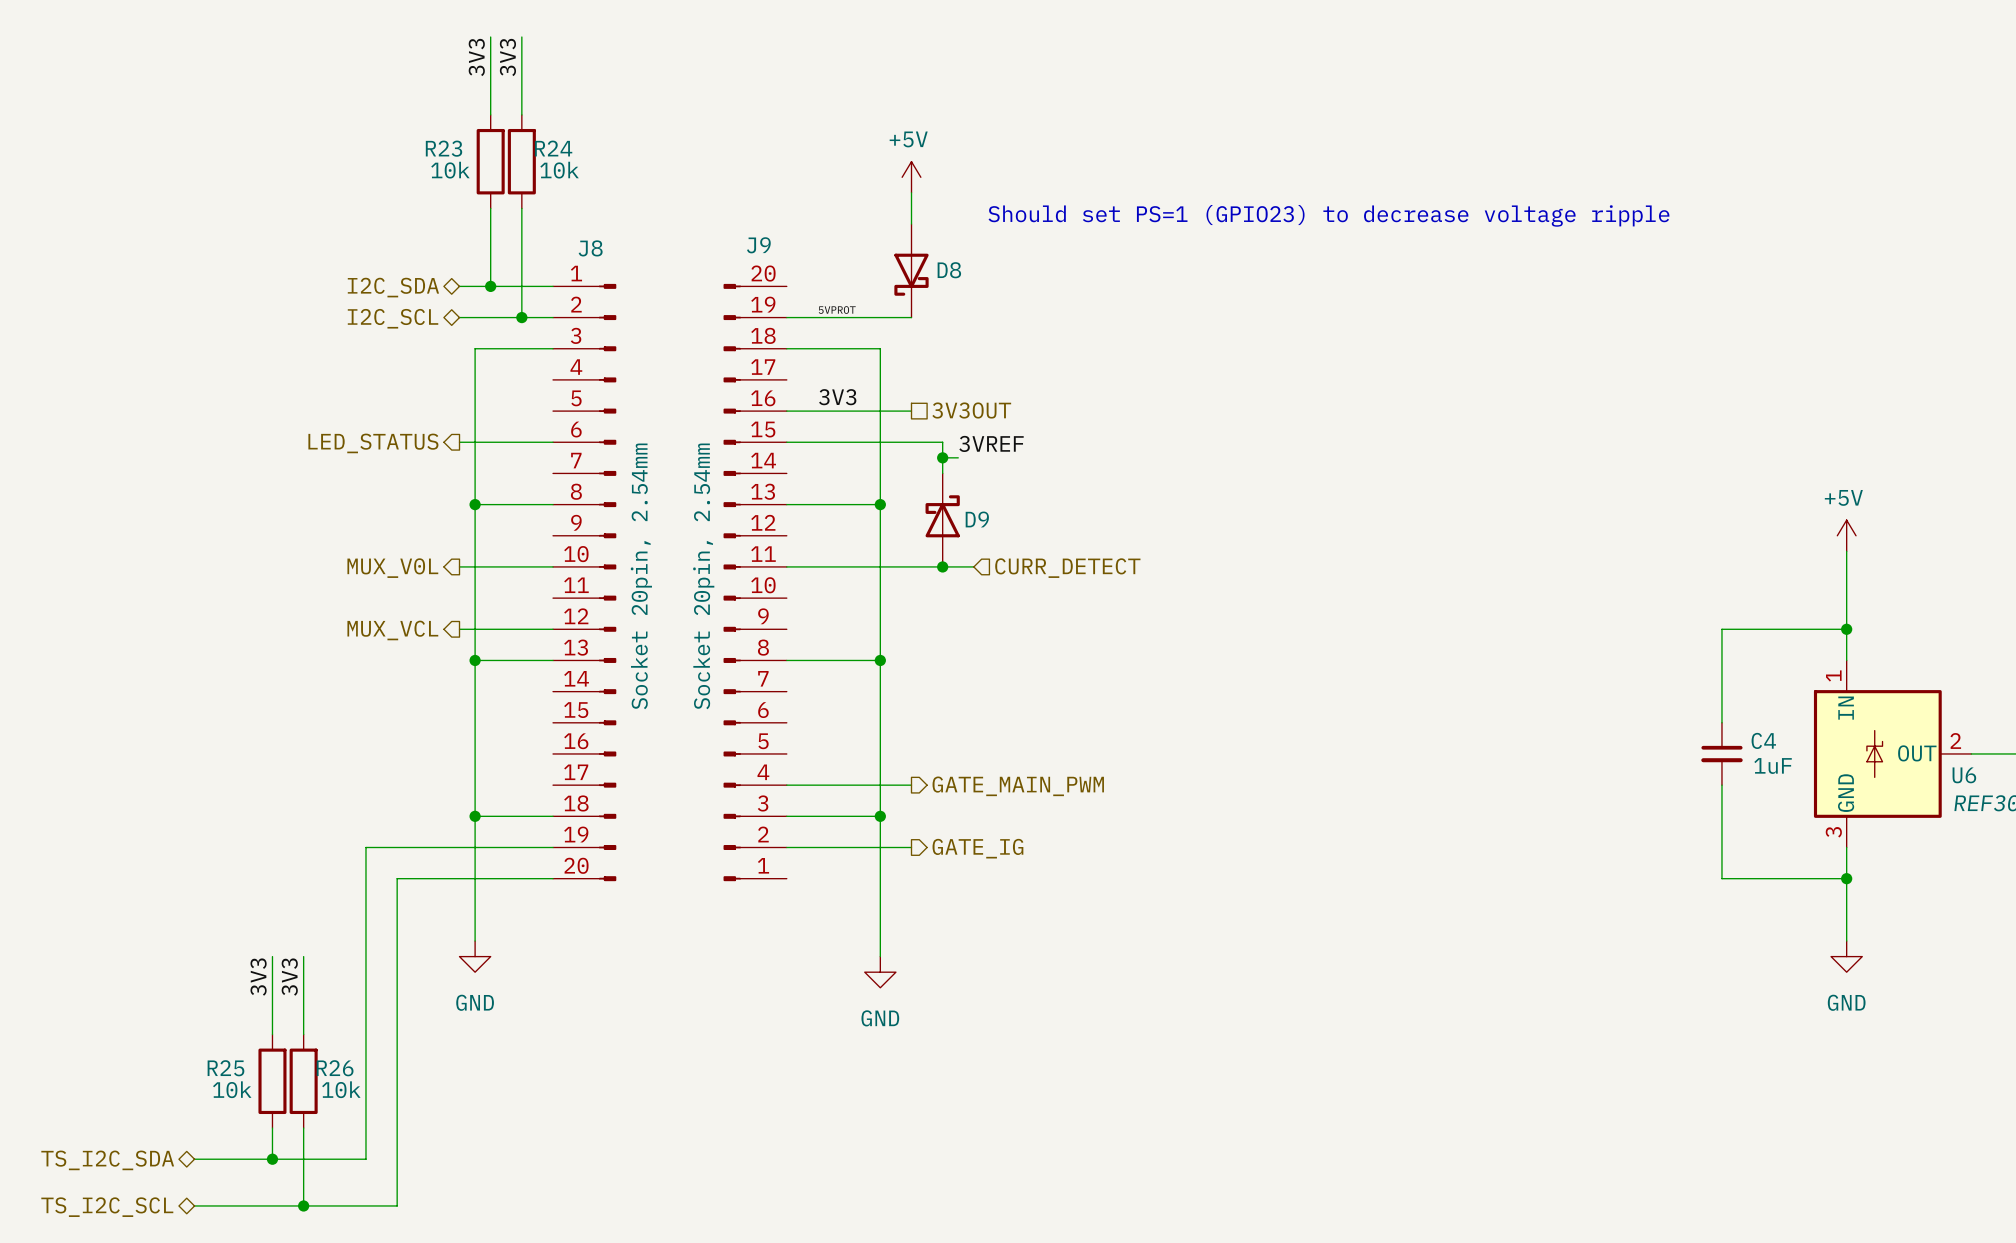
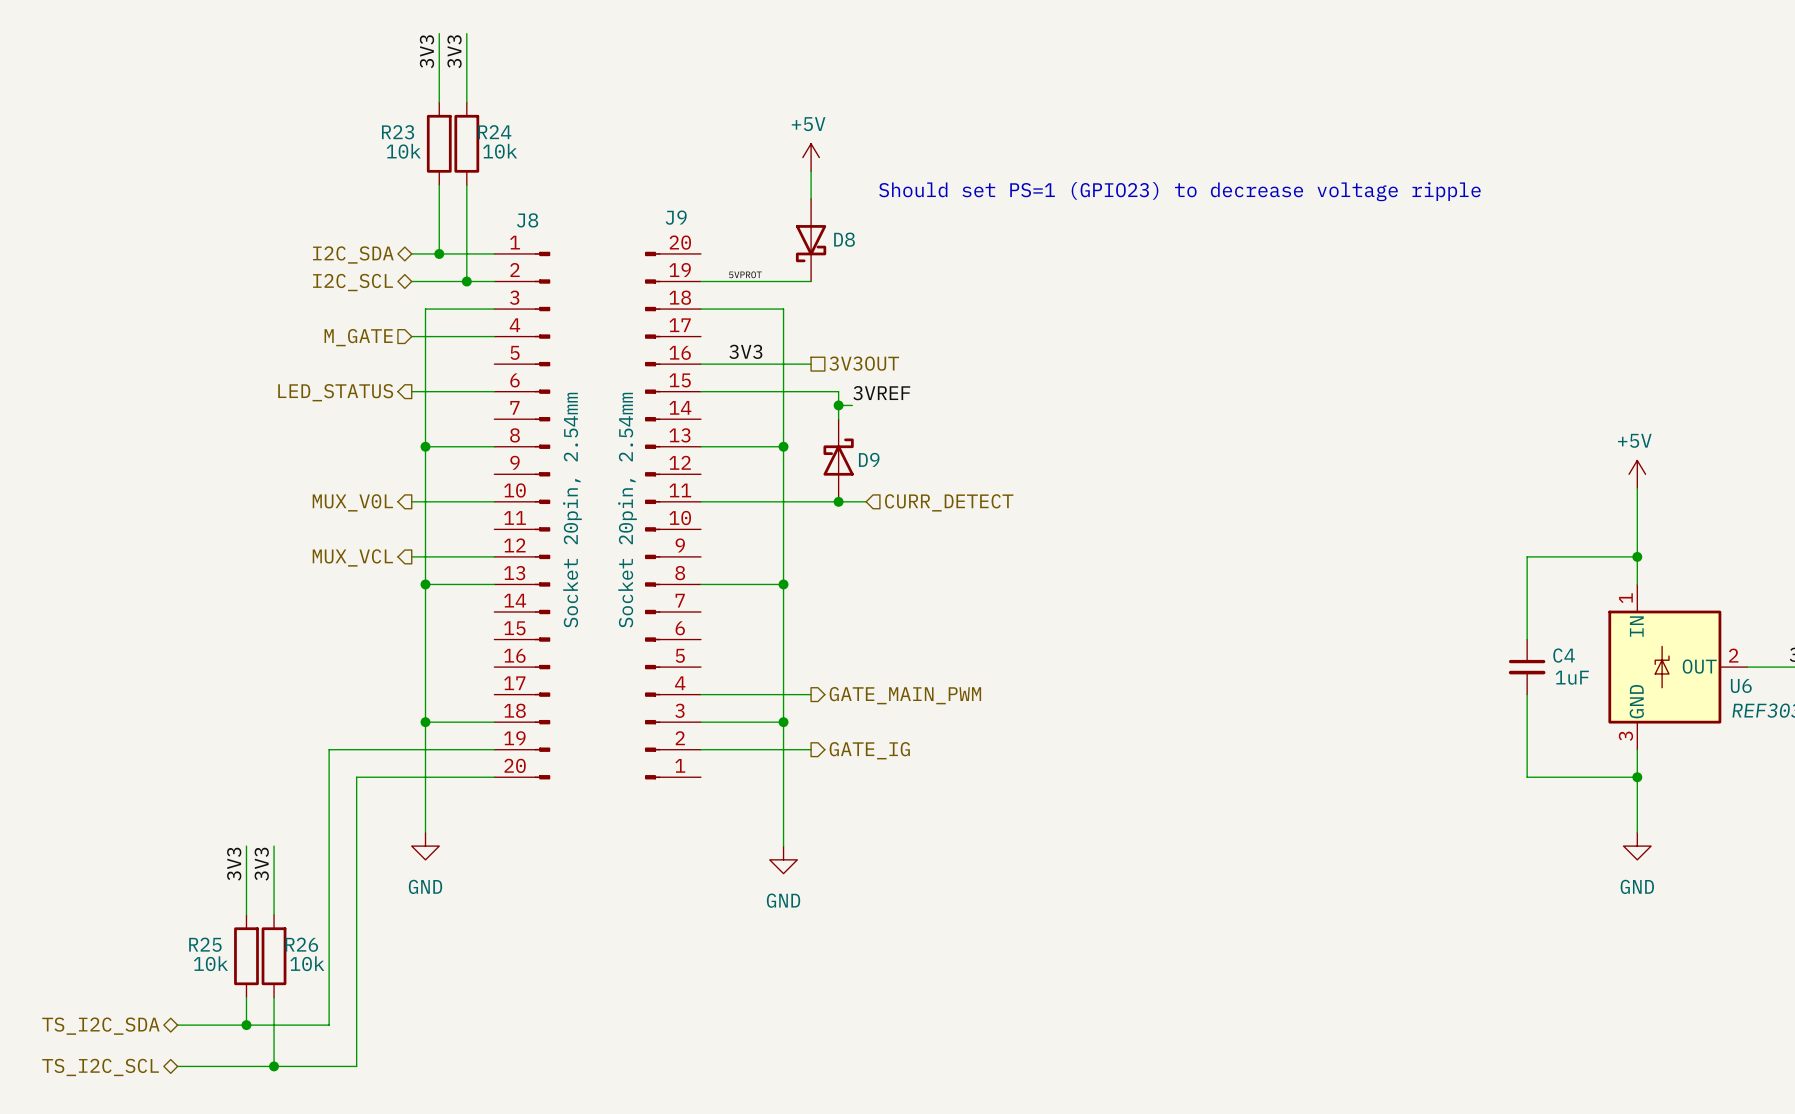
wire: none -> (411, 336) (494, 336)
hierarchical label: none -> M_GATE (358, 337)

